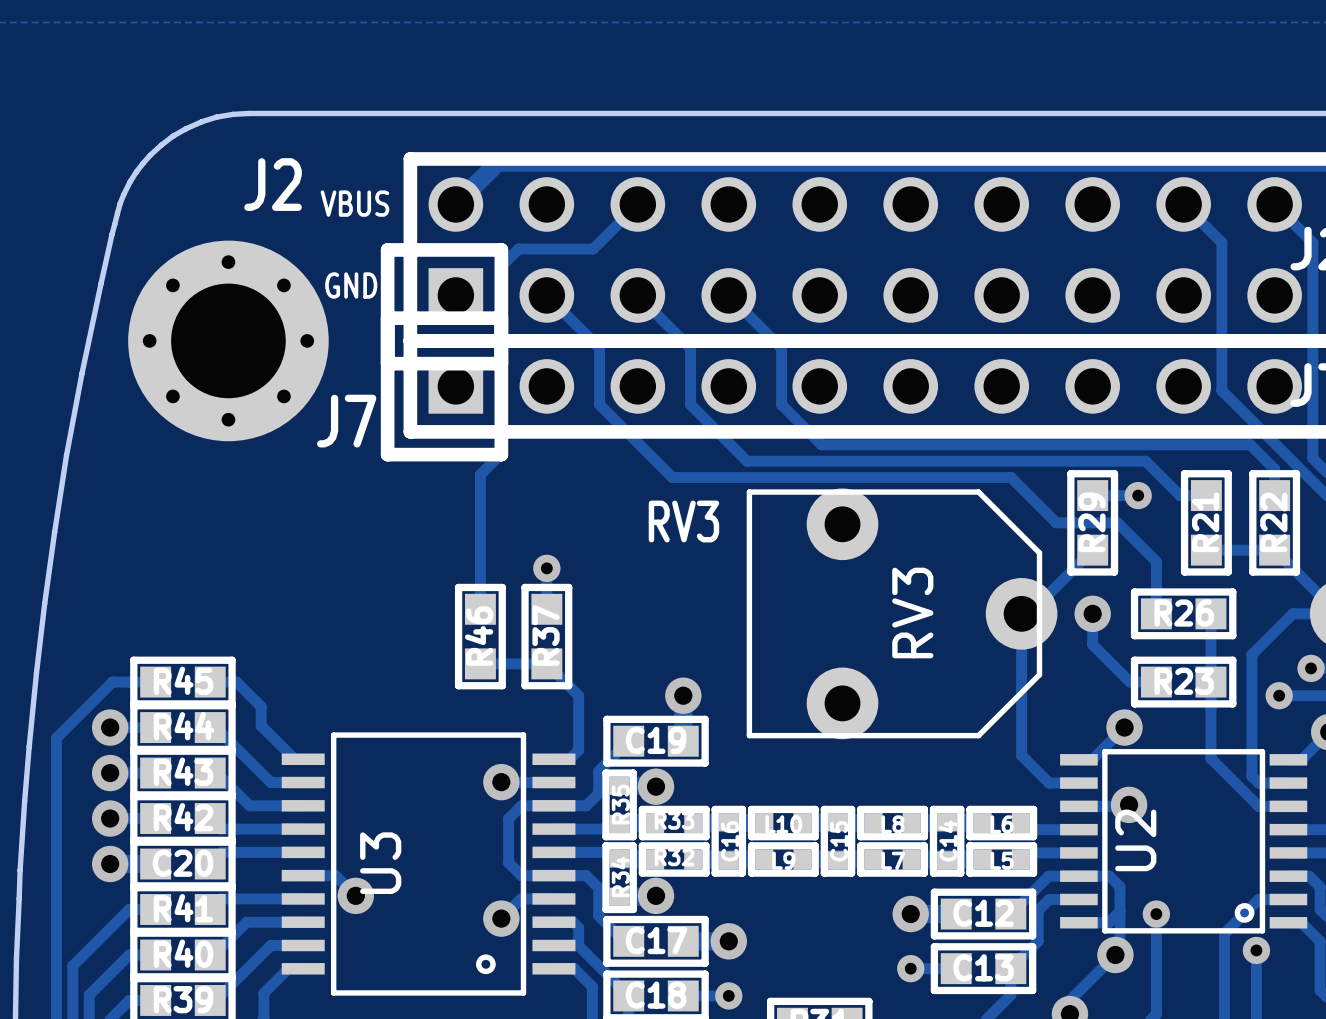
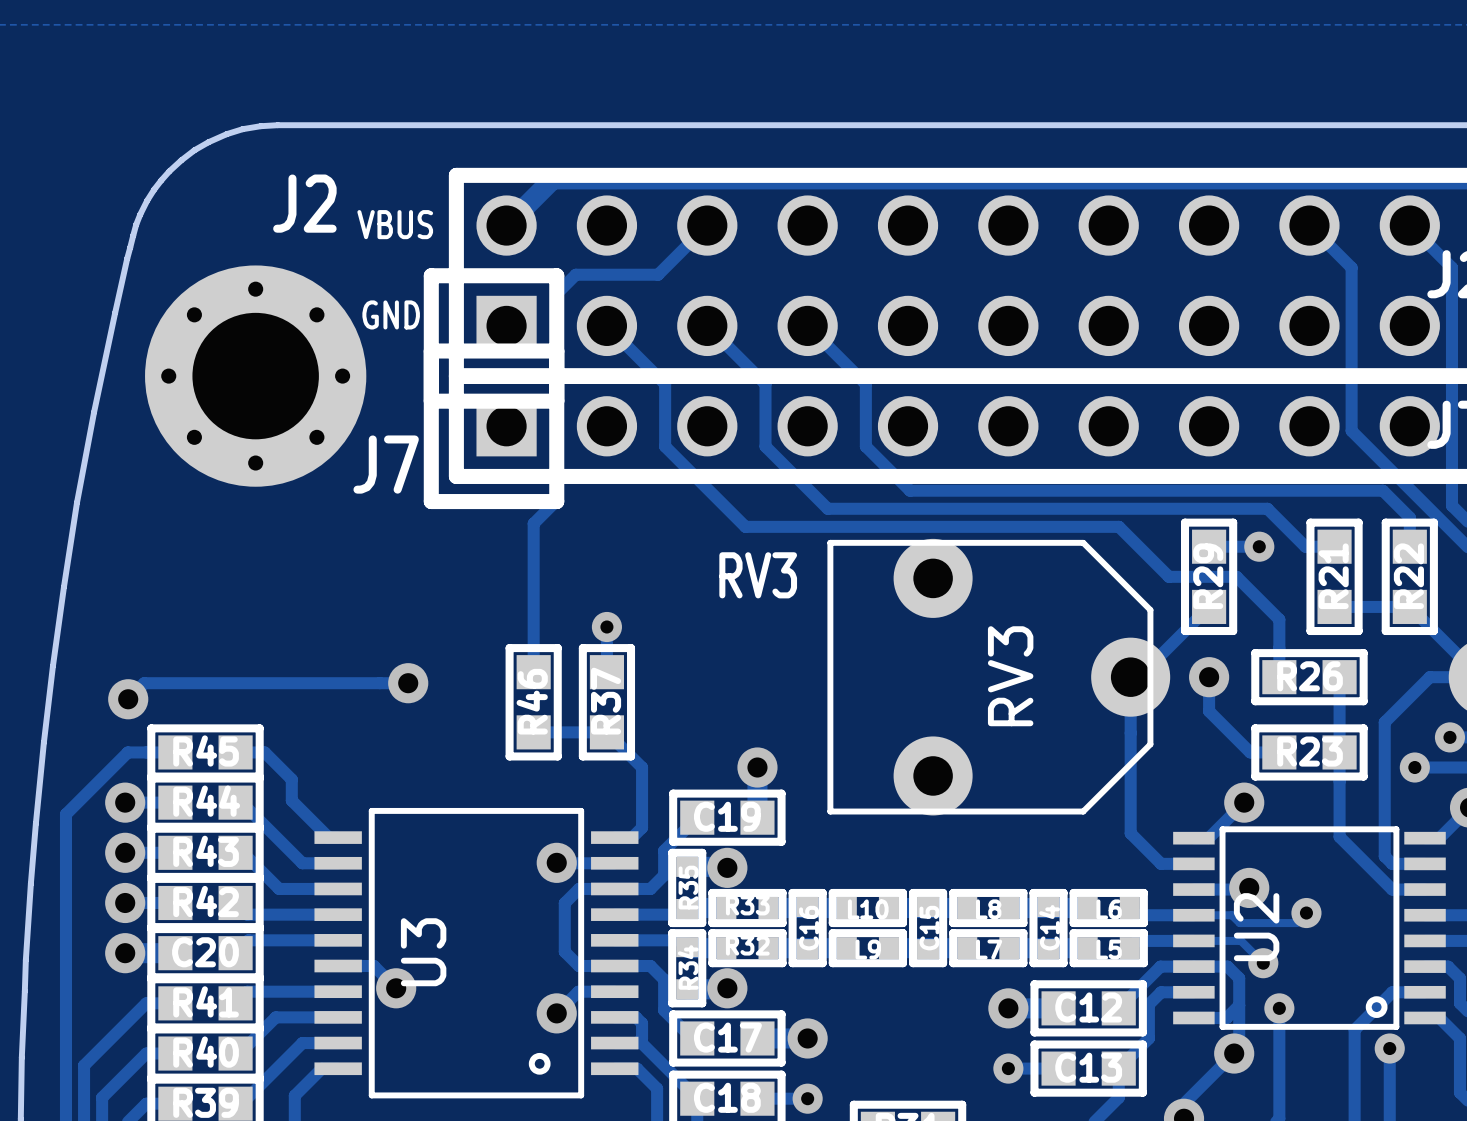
track: none -> (408, 683) (144, 683) (128, 699)
via: none -> (408, 683)
via: none -> (128, 699)
track: none -> (1306, 913) (1296, 923) (1239, 923) (1231, 915) (1193, 915)
via: none -> (1306, 913)
track: none -> (1193, 940) (1241, 940) (1263, 963)
via: none -> (1263, 963)

